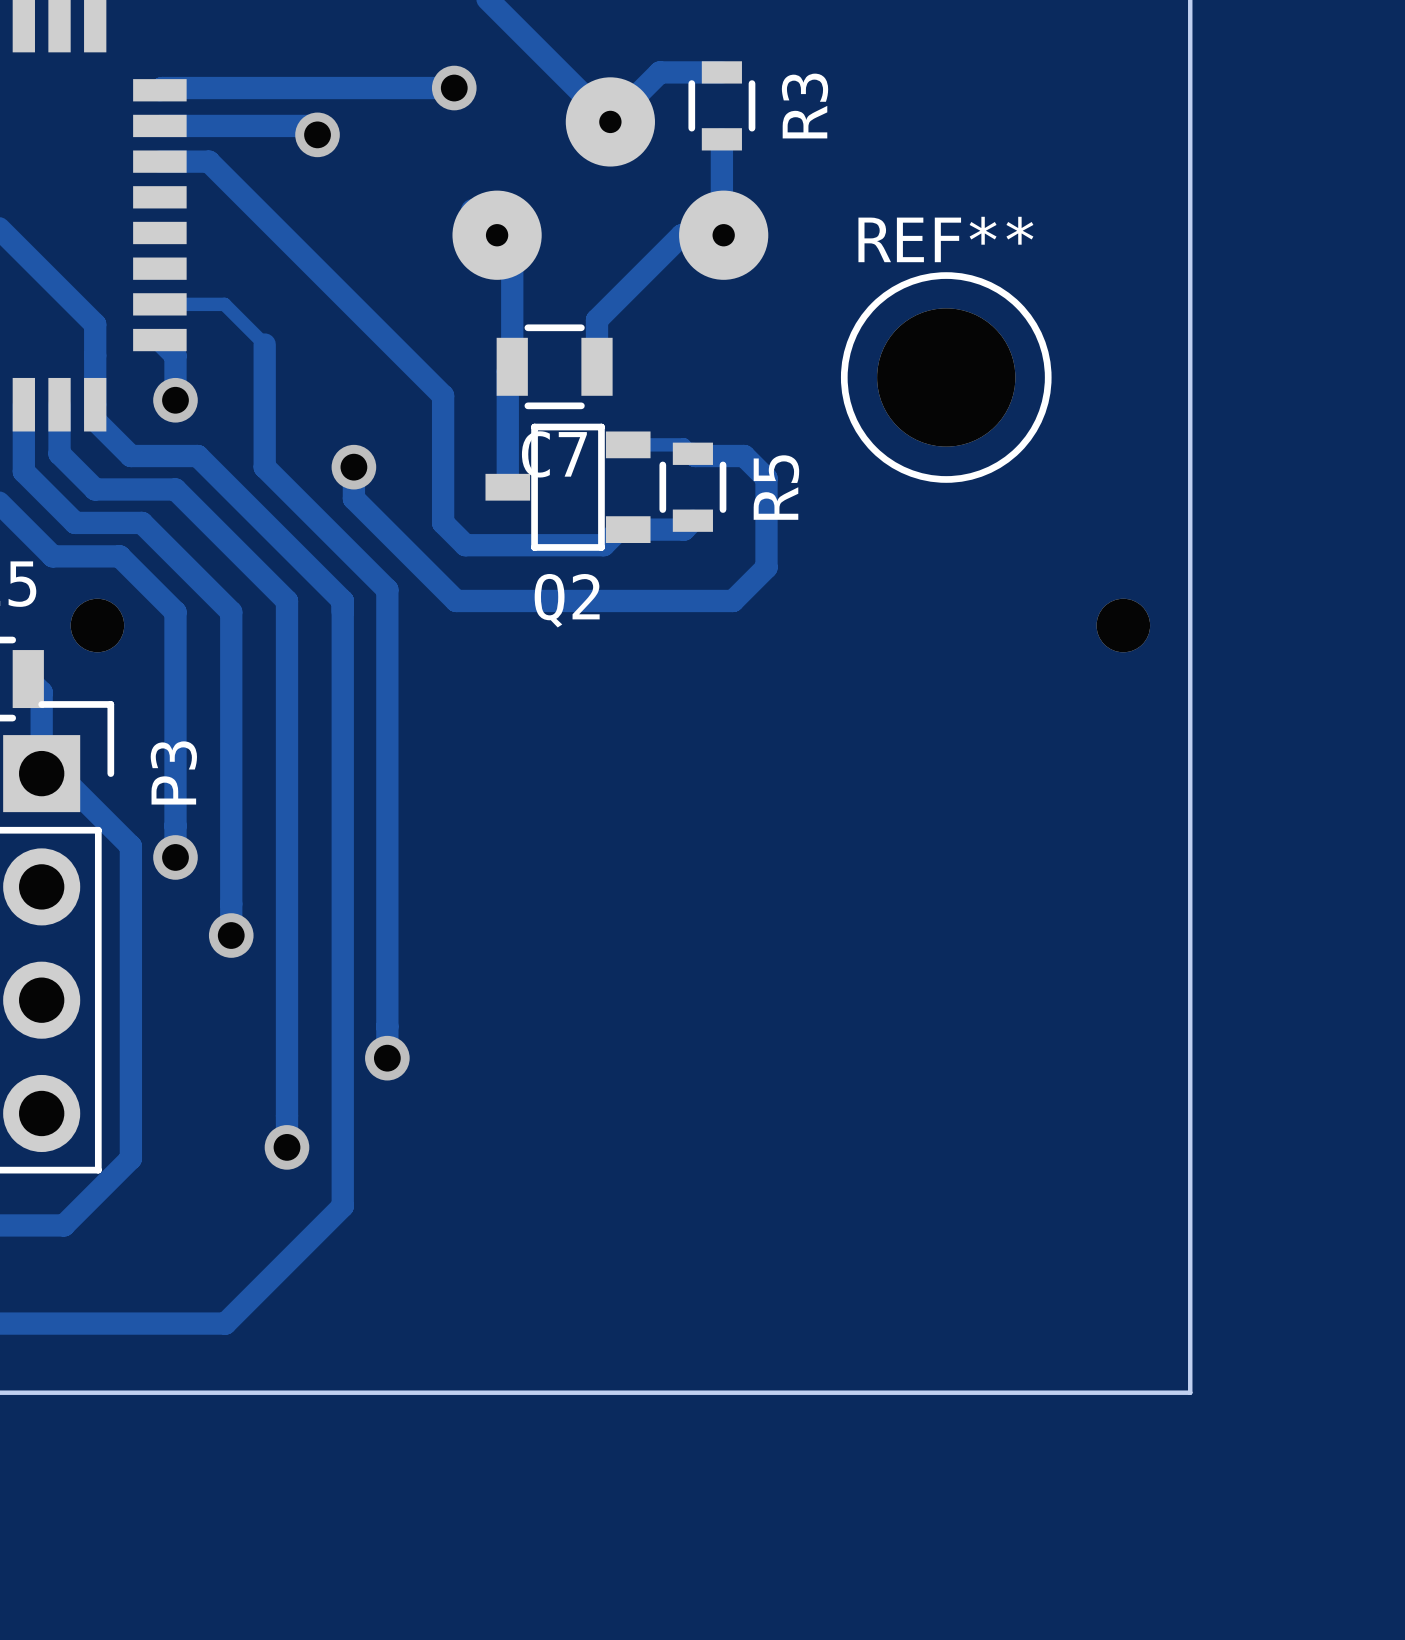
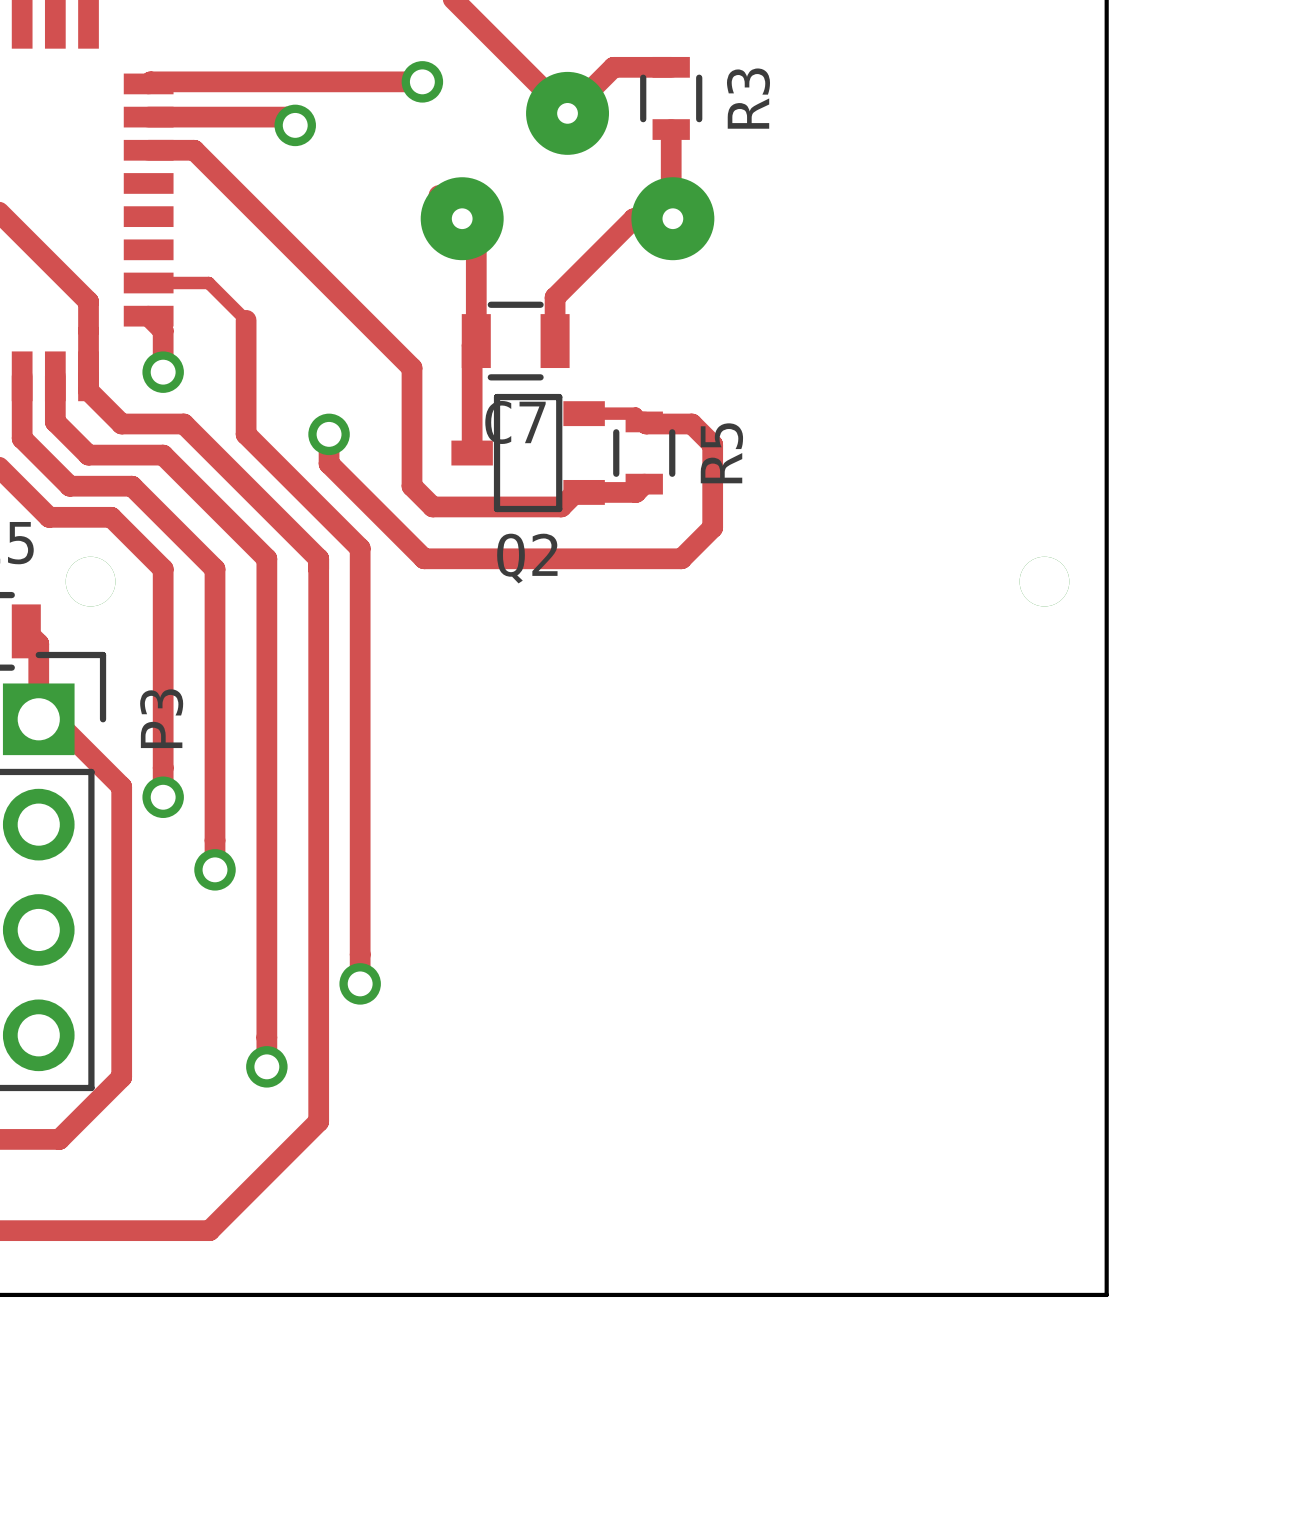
REF**: (946, 377) -> none

